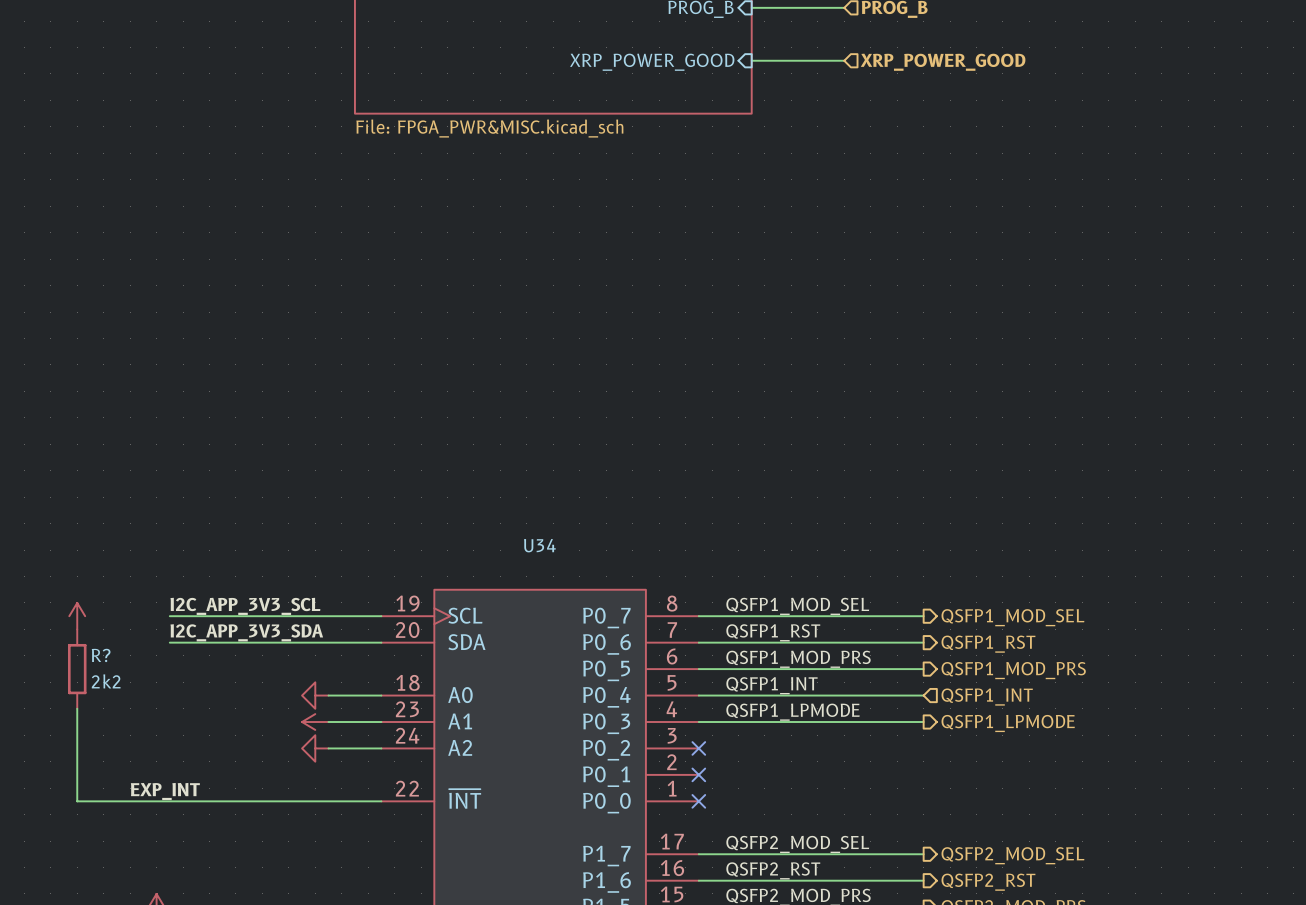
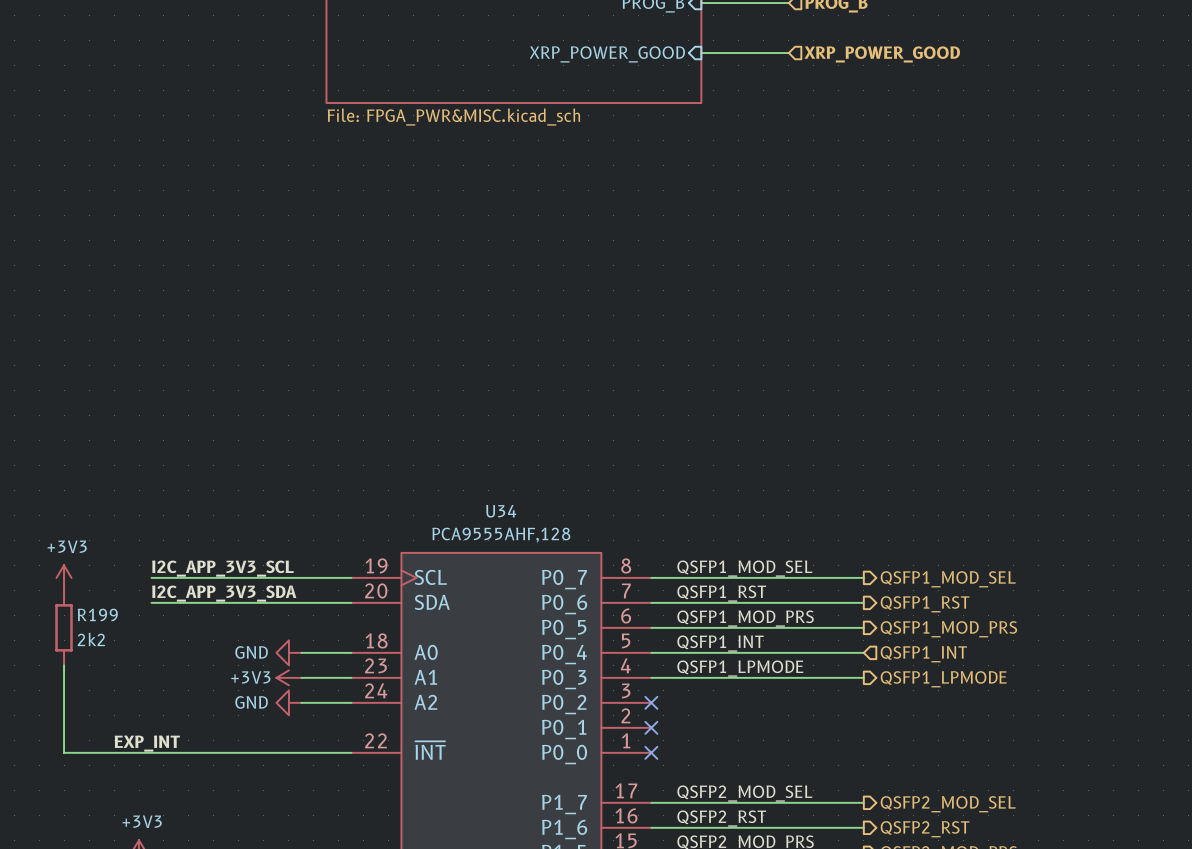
U34 value: none -> PCA9555AHF,128 (501, 535)
power symbol text: none -> +3V3 (67, 546)
R? name: R? (101, 655) -> R199 (97, 614)
power symbol text: none -> GND (251, 652)
power symbol text: none -> +3V3 (250, 677)
power symbol text: none -> GND (251, 702)
power symbol text: none -> +3V3 (142, 821)

